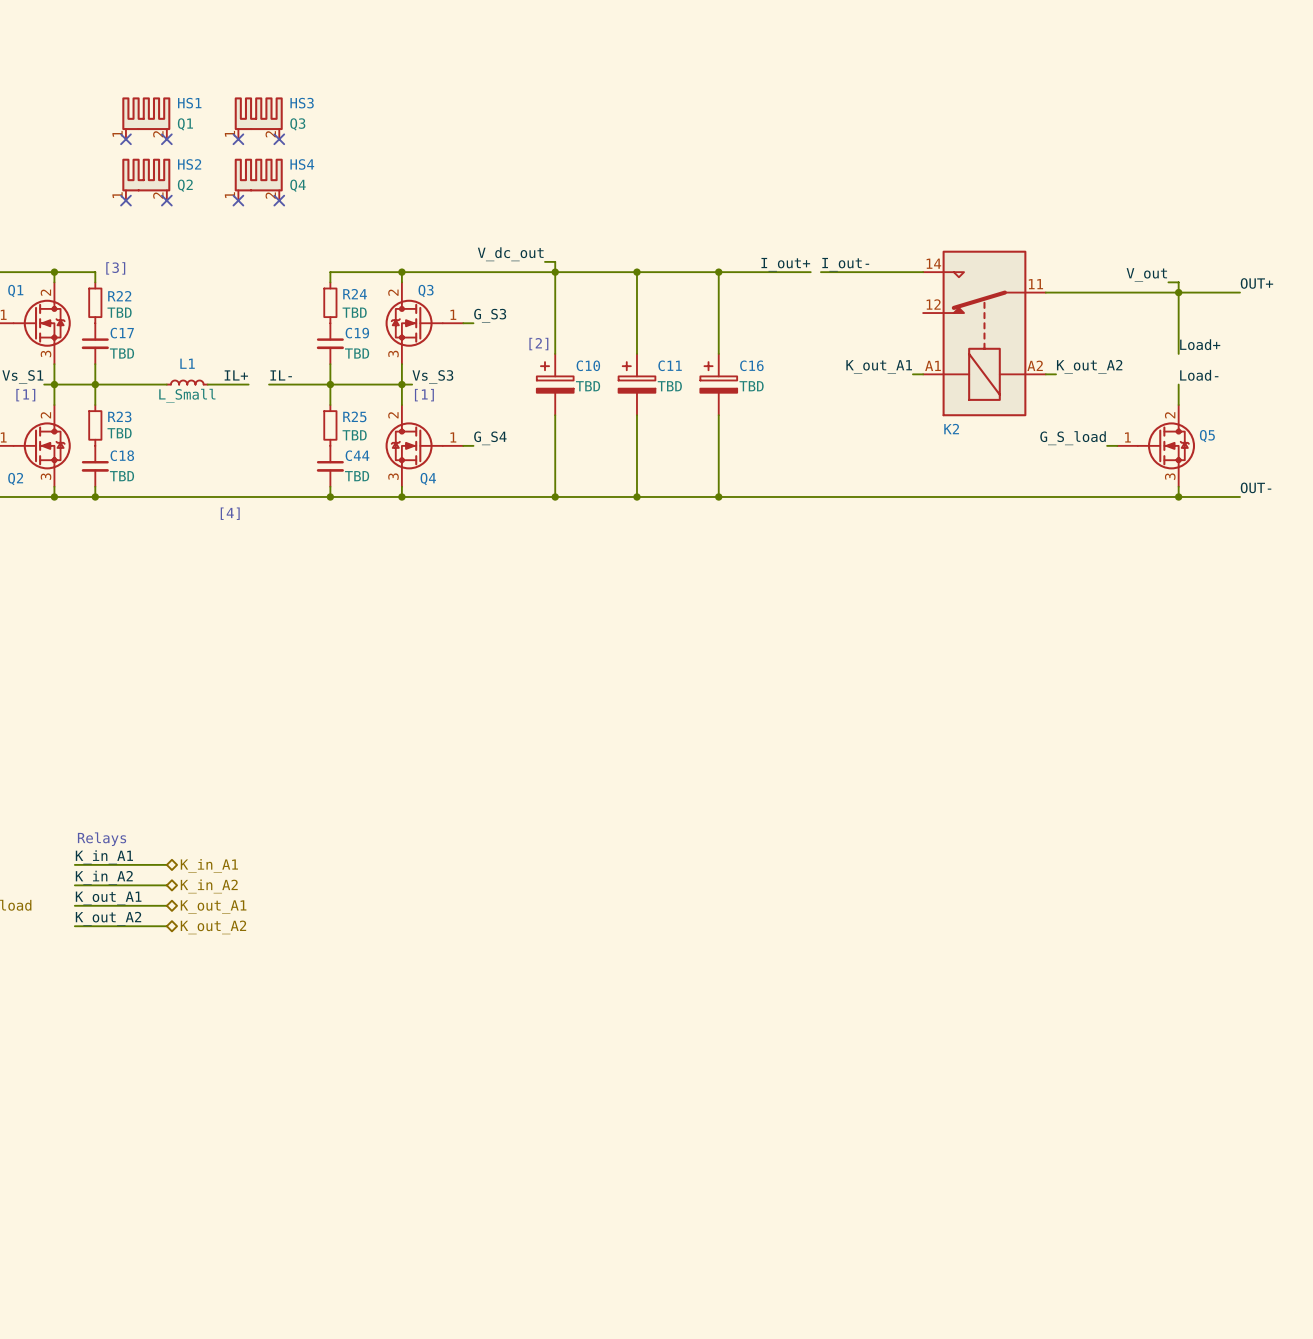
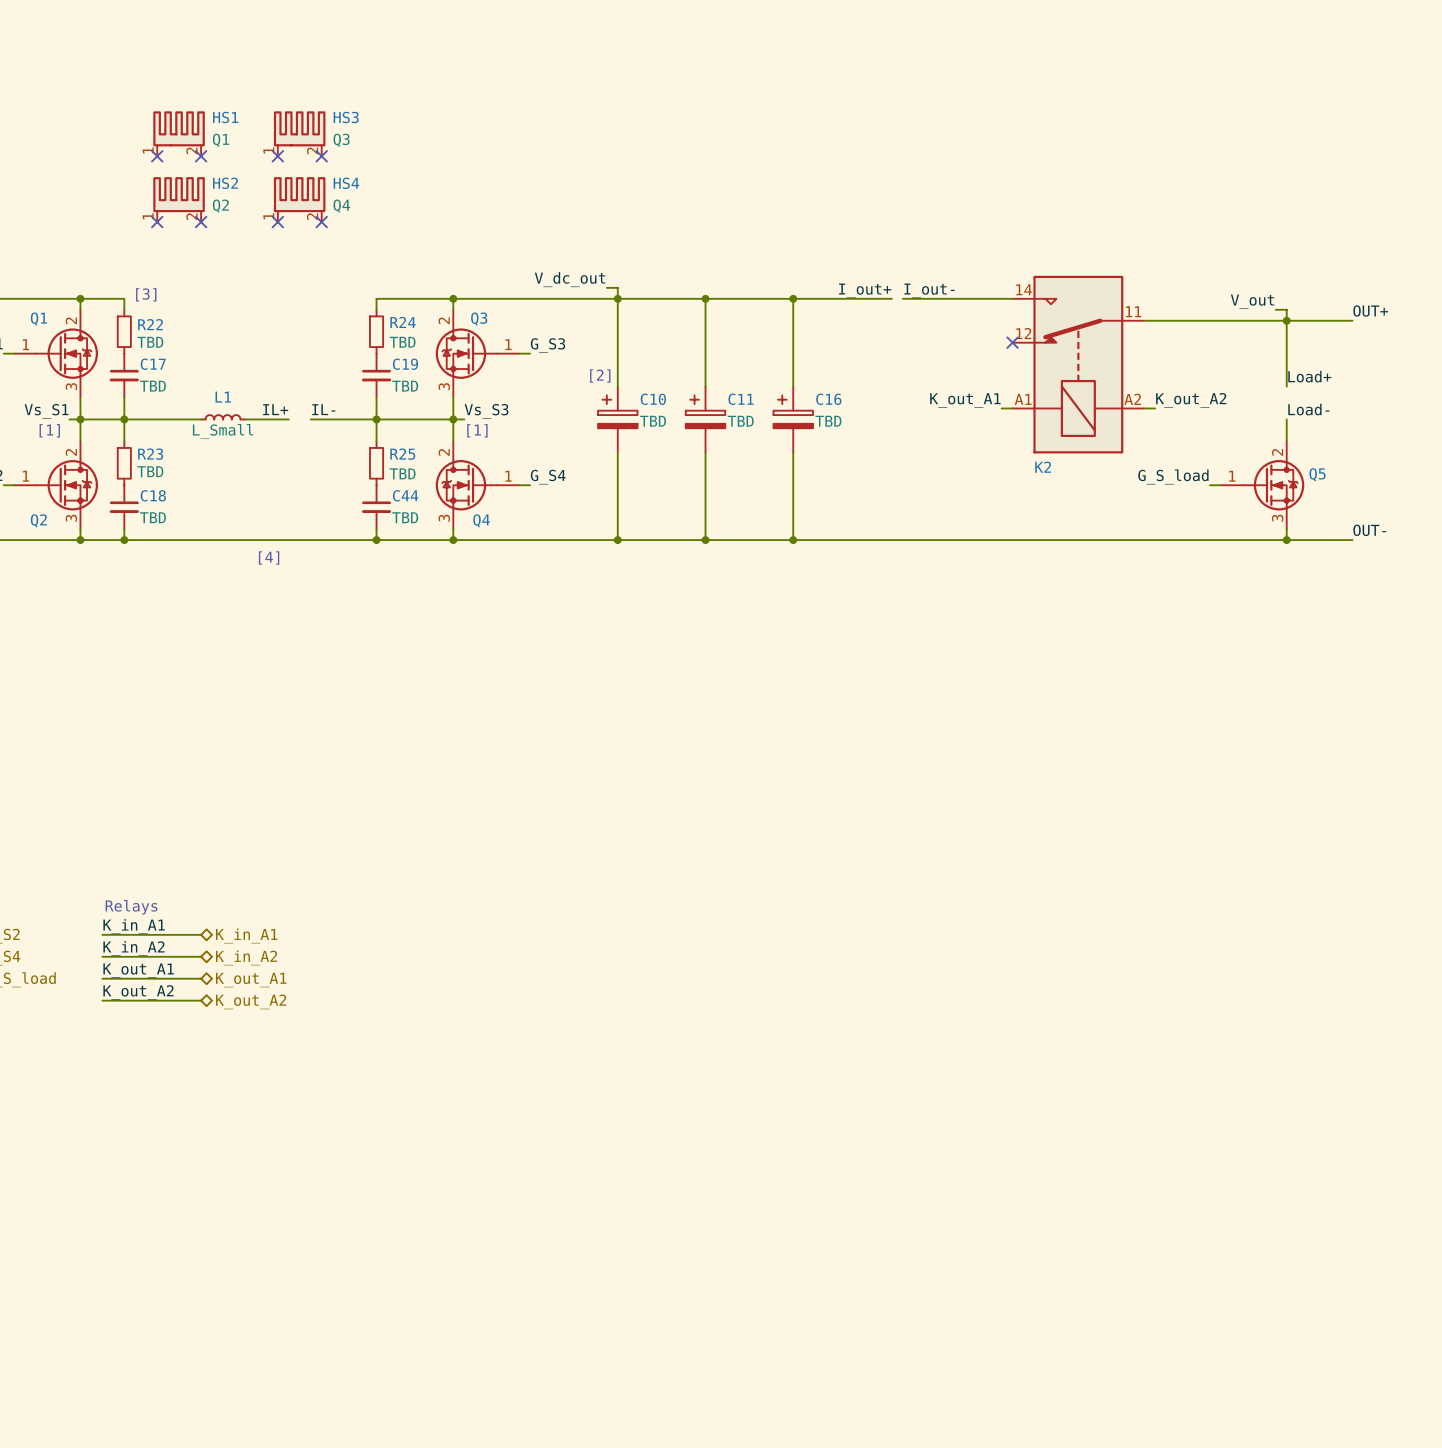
no-connect mark: none -> (1012, 342)

